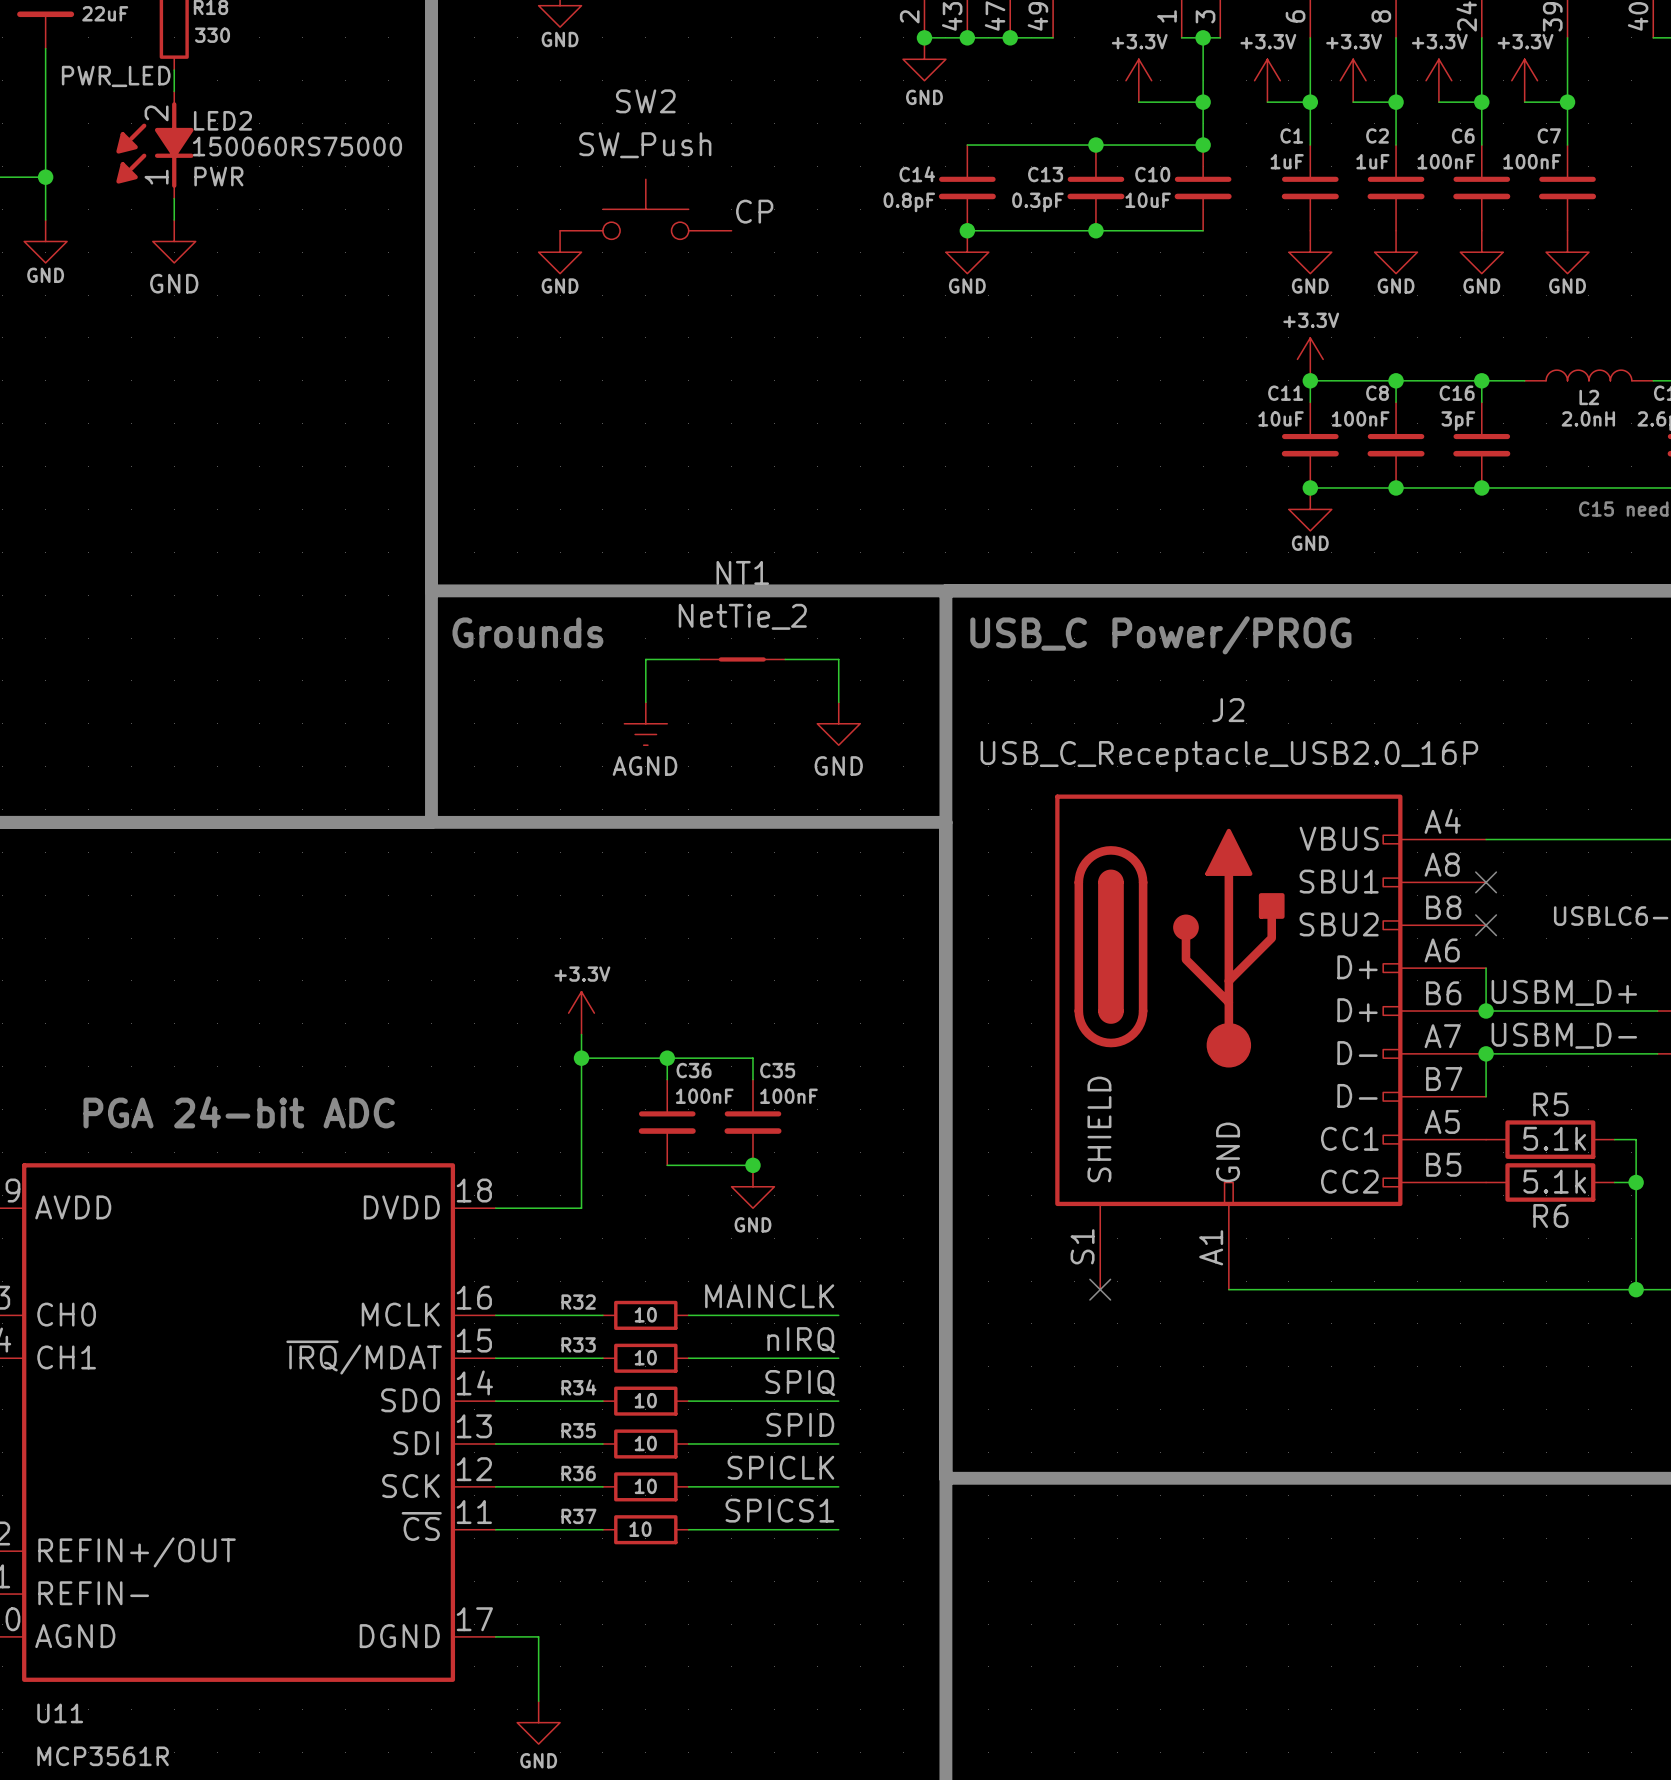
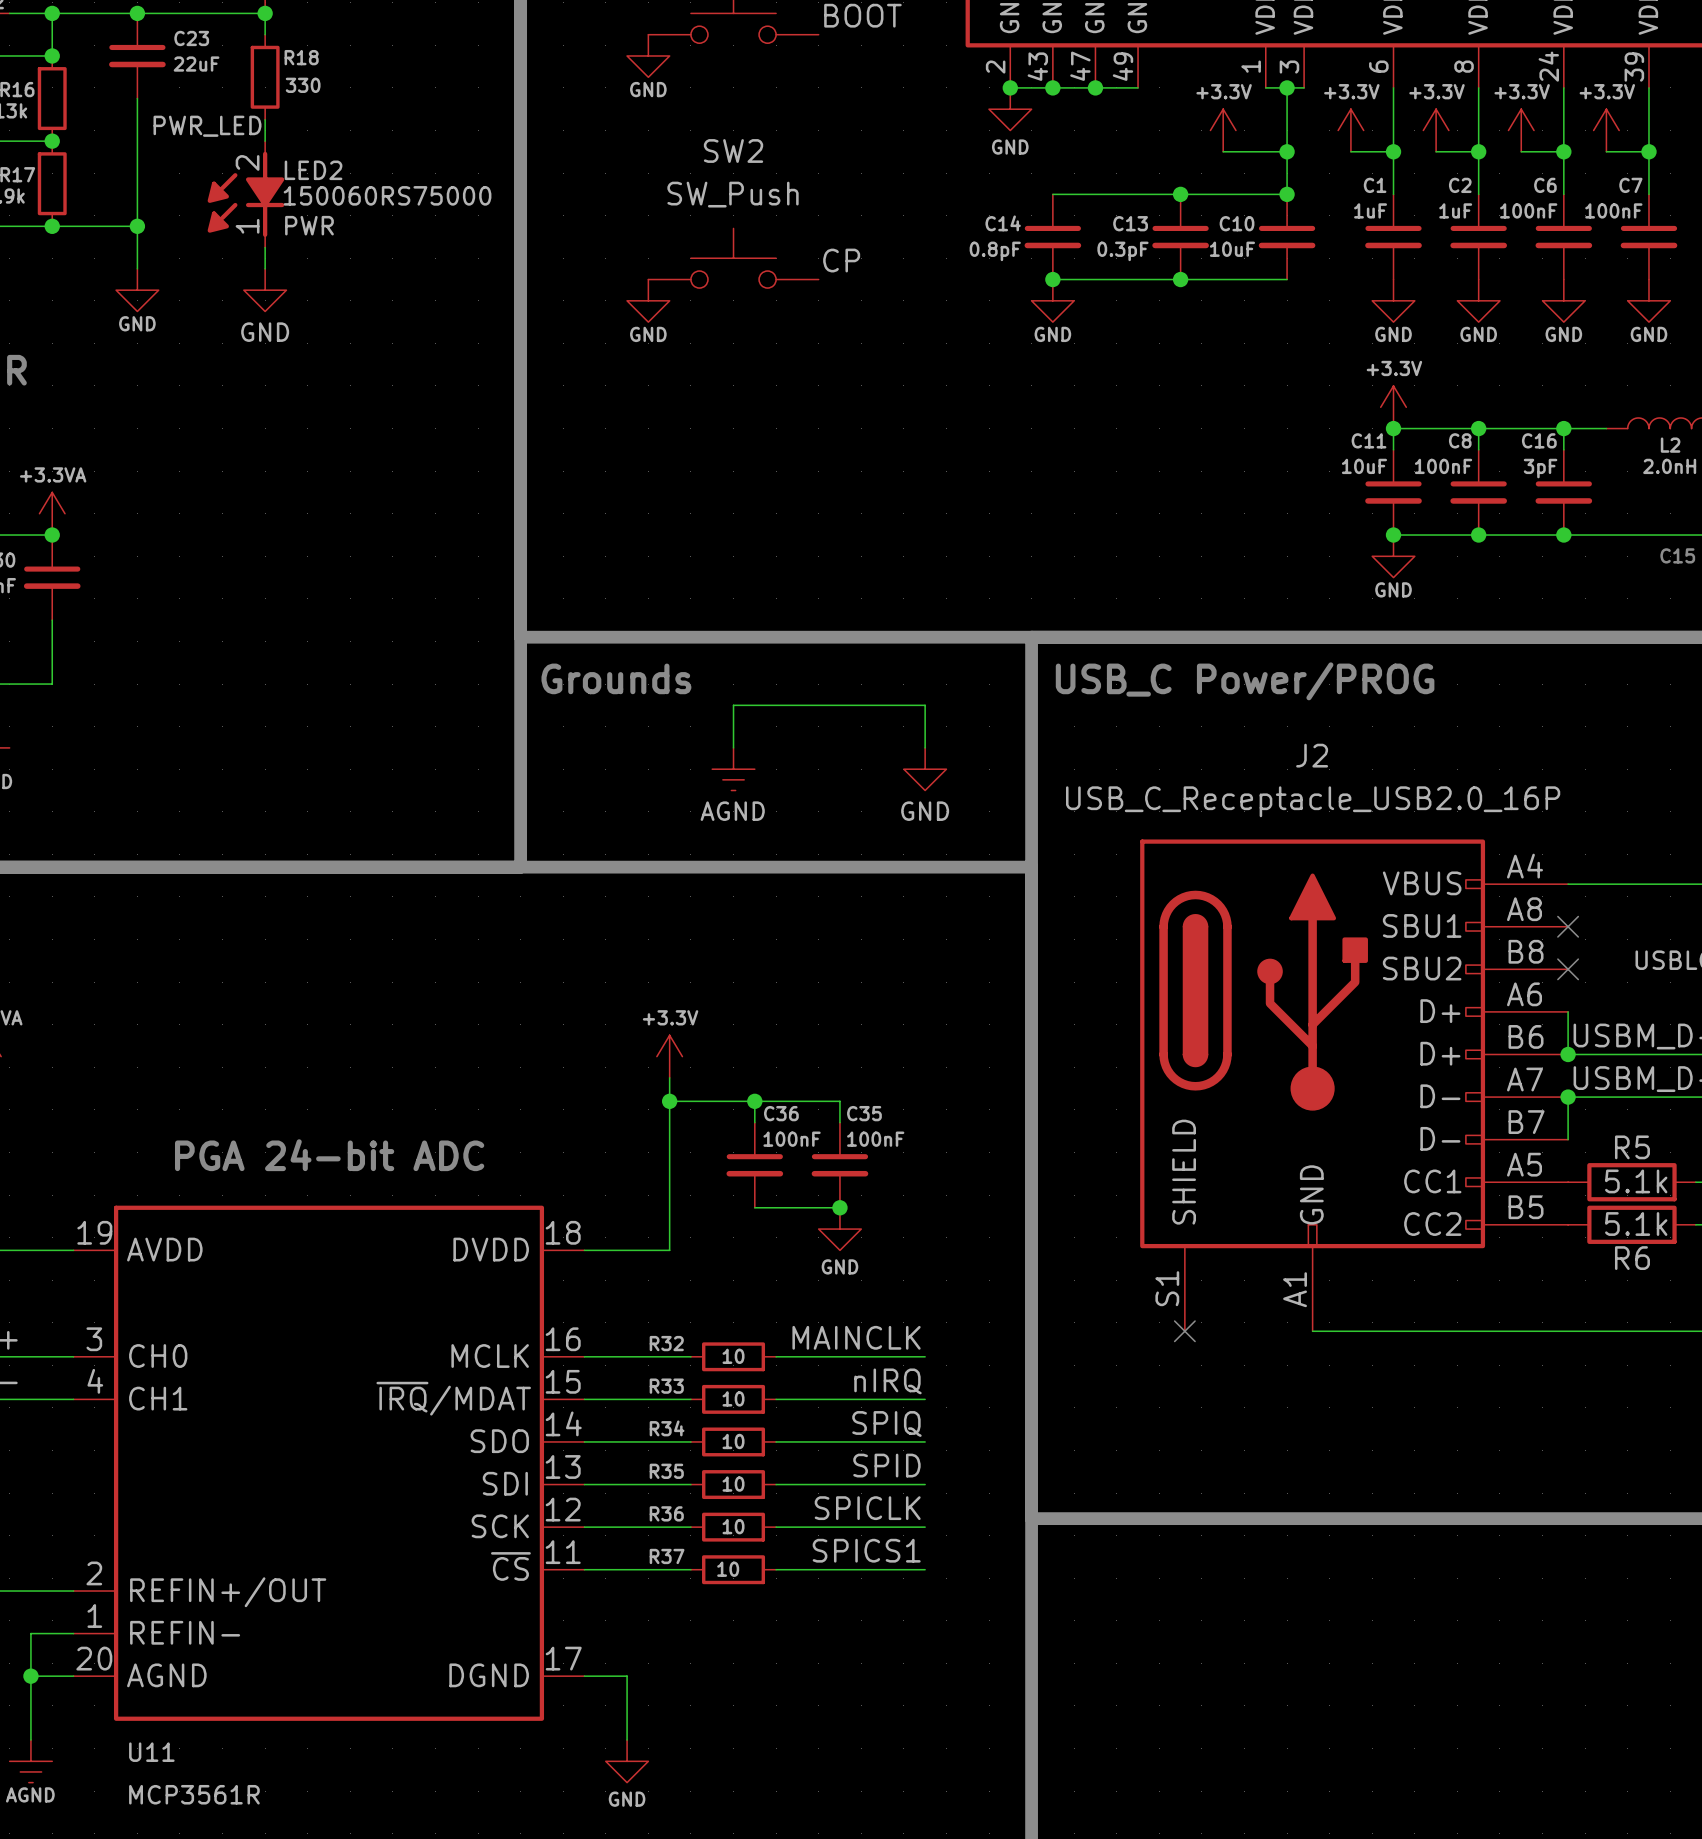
NT1: NetTie_2 (742, 659) -> none

